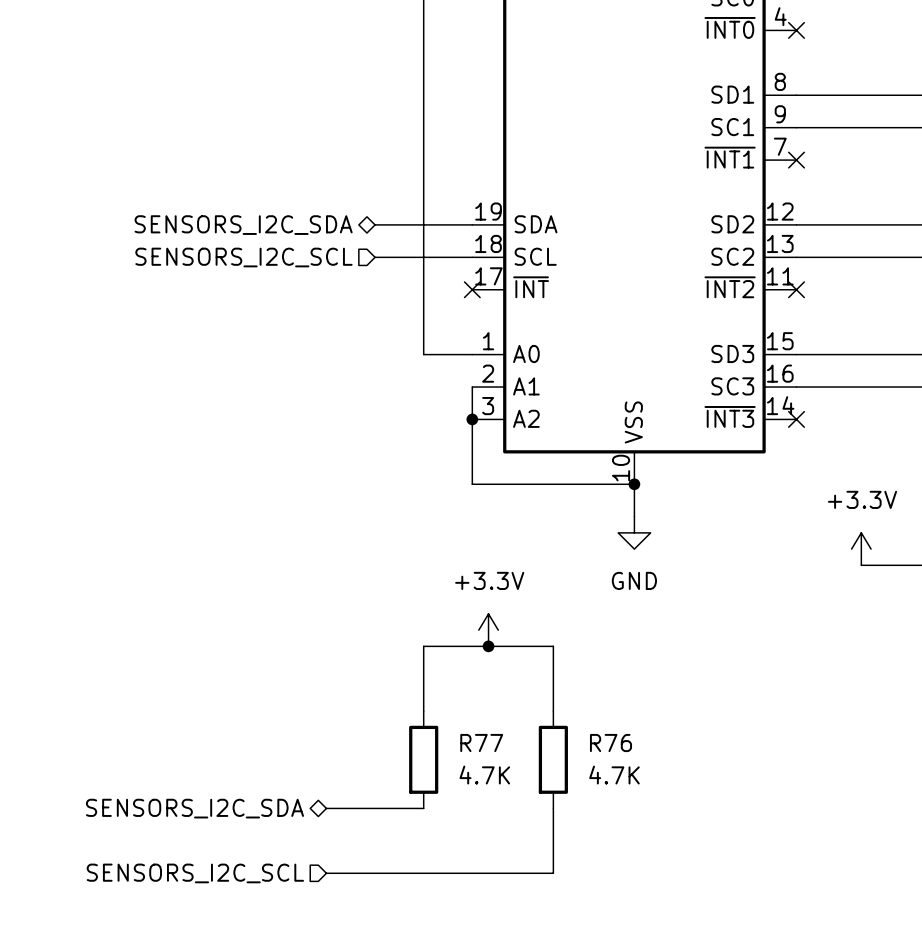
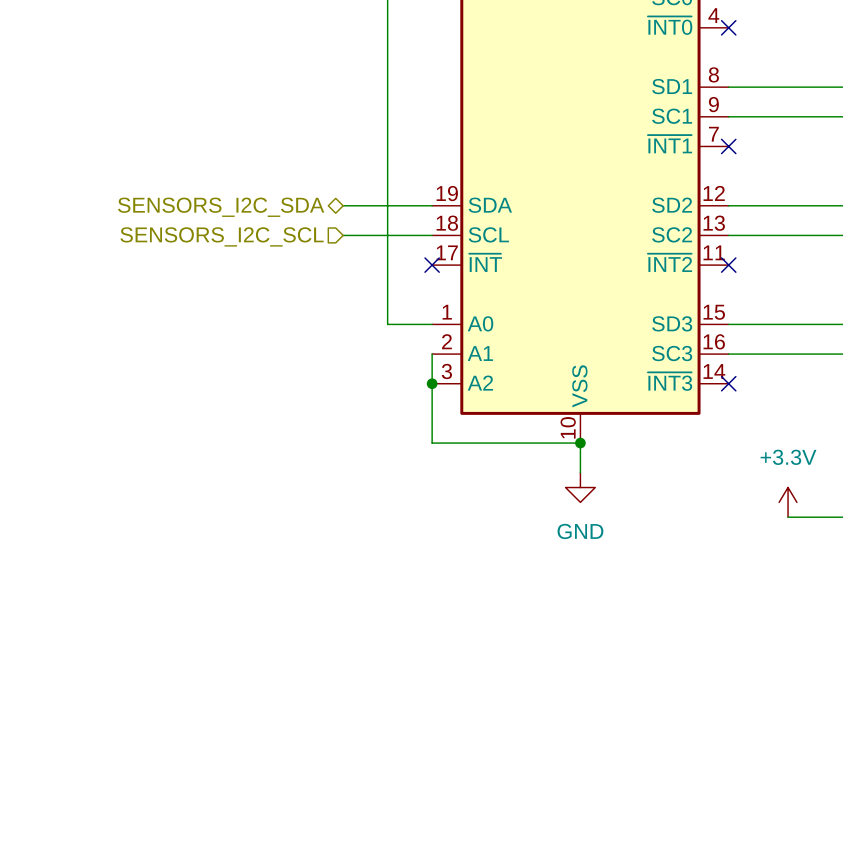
power symbol: +3.3V (488, 630) -> none
junction: (488, 646) -> none
wire: (423, 711) (423, 646) (553, 646) (553, 711) -> none
R77: 4.7K (423, 759) -> none
R76: 4.7K (553, 759) -> none
hierarchical label: SENSORS_I2C_SDA (194, 808) -> none
wire: (326, 808) (423, 808) -> none
wire: (553, 808) (553, 873) (326, 873) -> none
hierarchical label: SENSORS_I2C_SCL (195, 873) -> none

